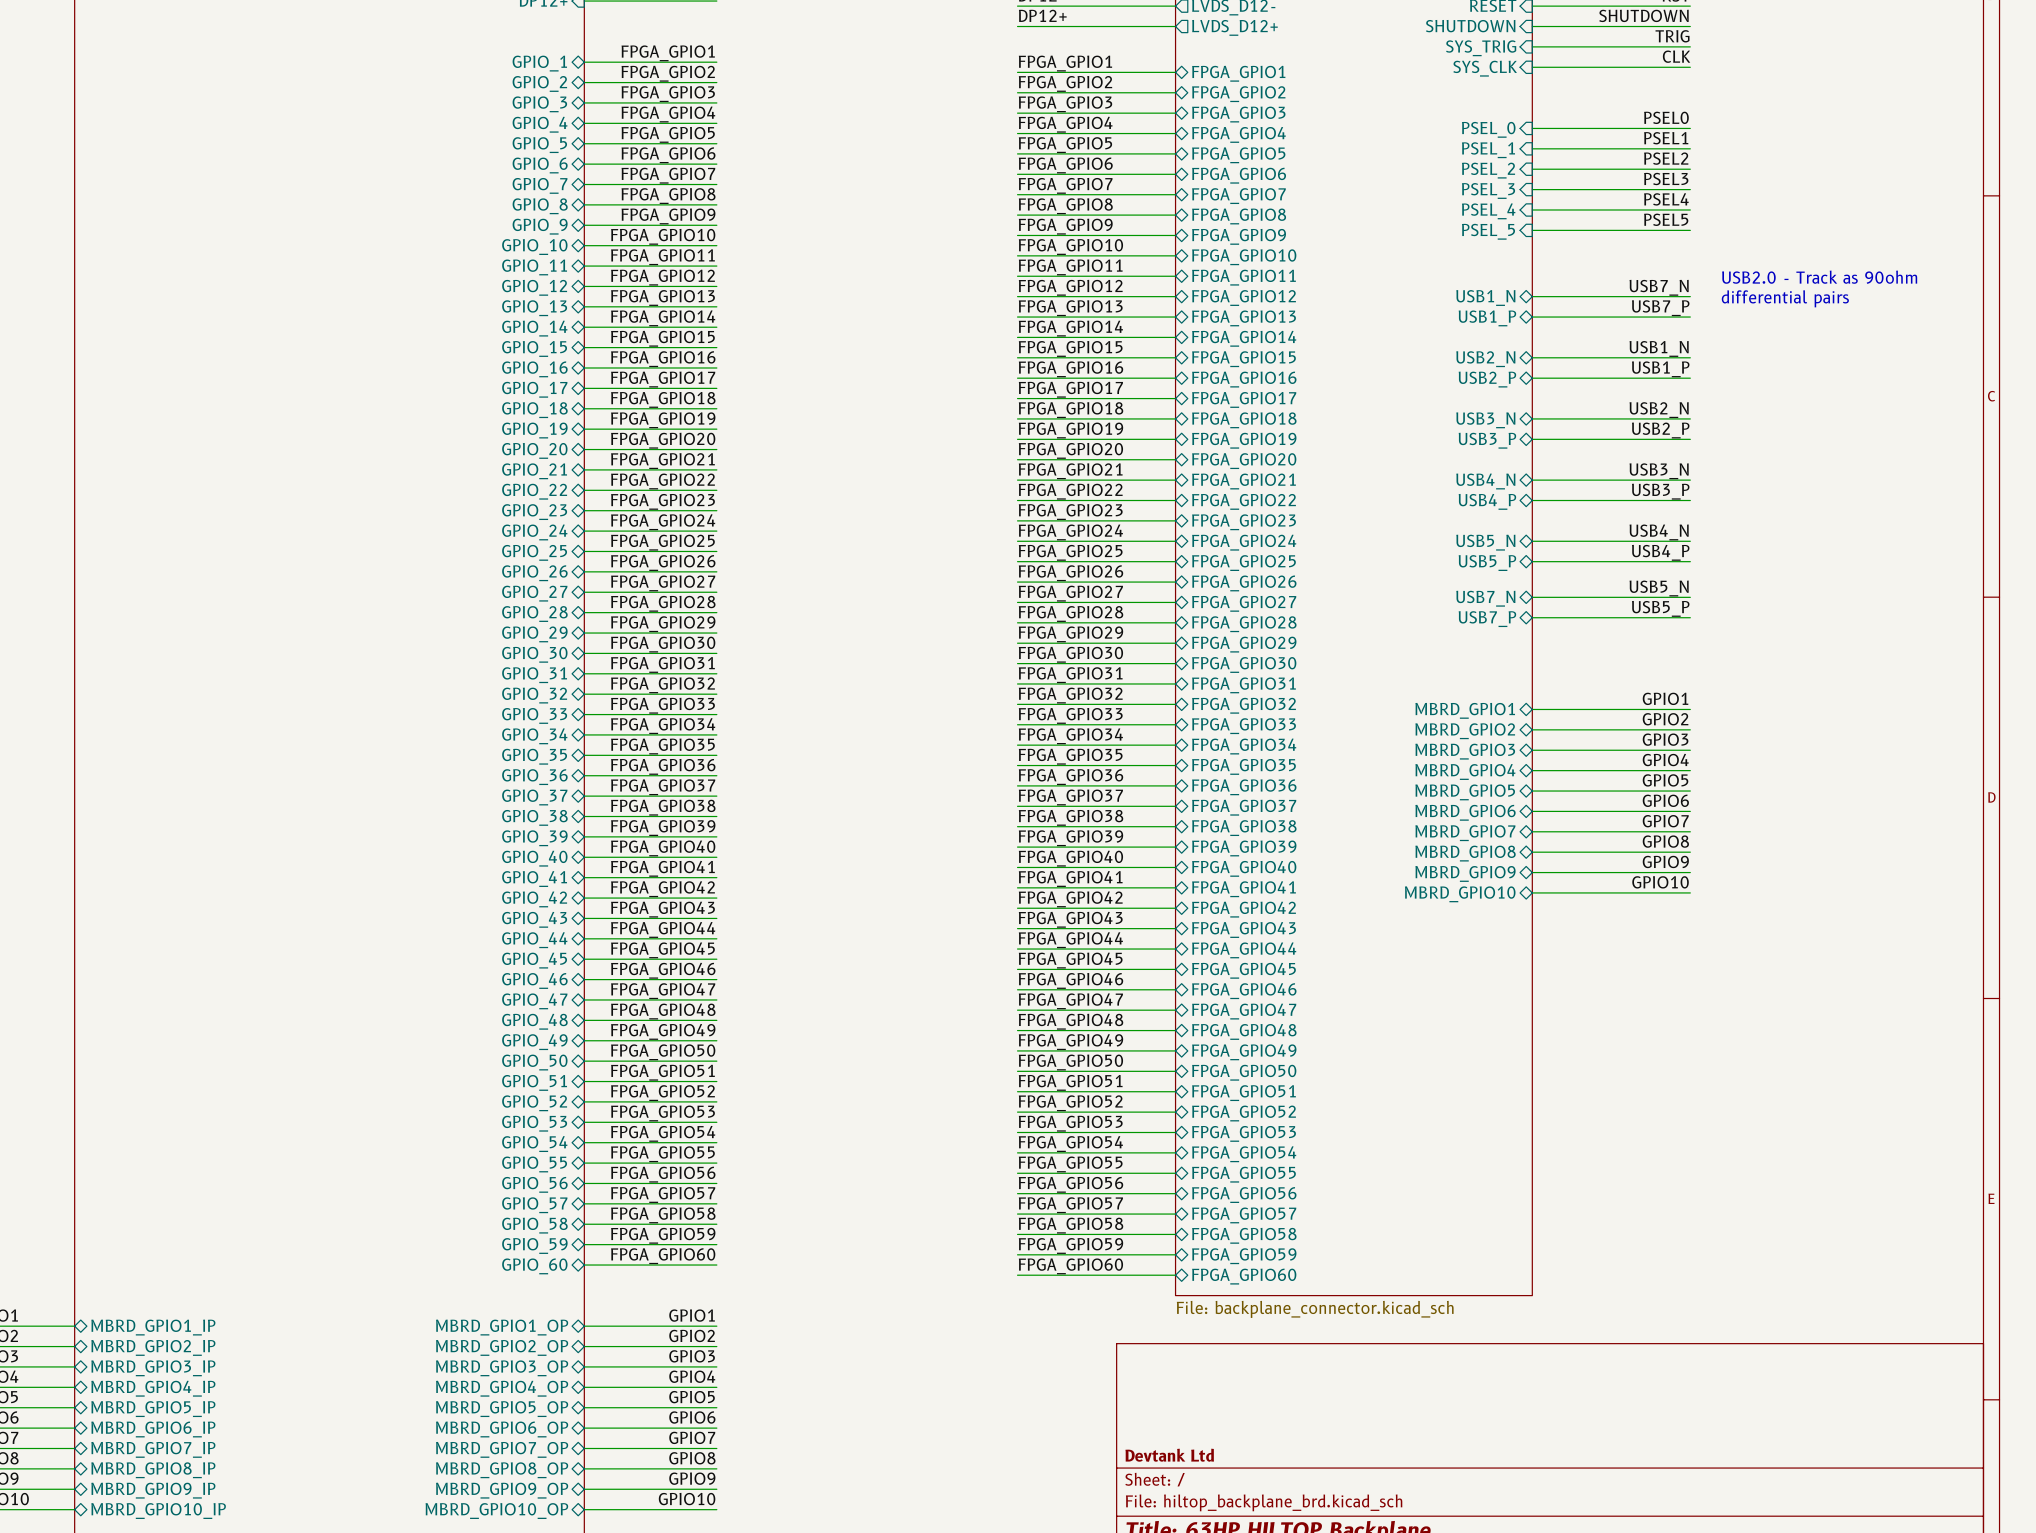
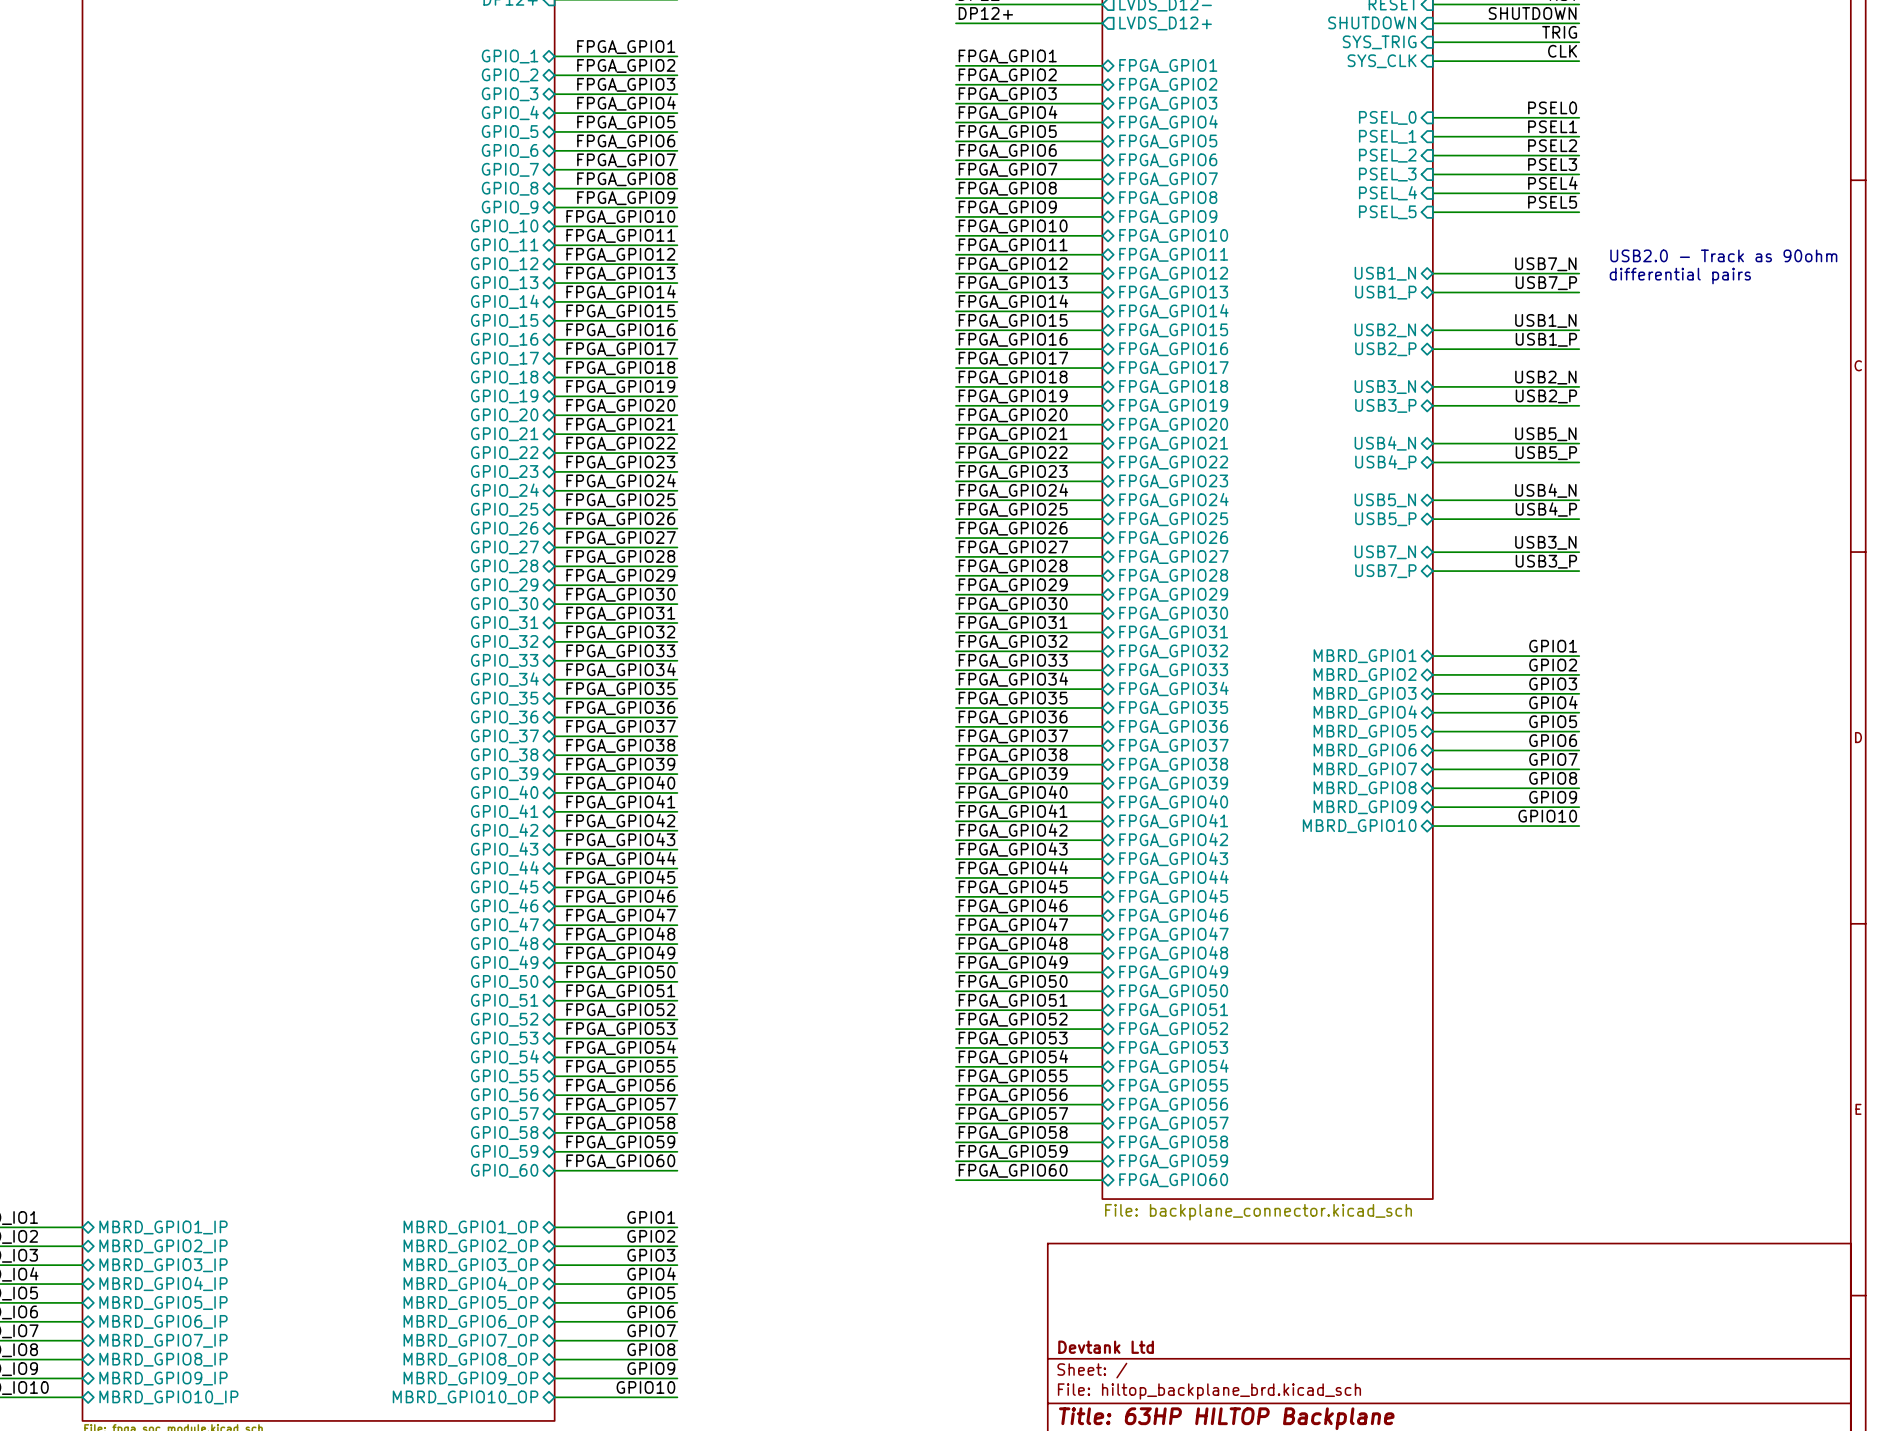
label: USB3_N (1659, 471) -> USB5_N (1545, 434)
label: USB3_P (1660, 491) -> USB5_P (1546, 453)
label: USB5_N (1659, 588) -> USB3_N (1545, 542)
label: USB5_P (1660, 608) -> USB3_P (1546, 561)

